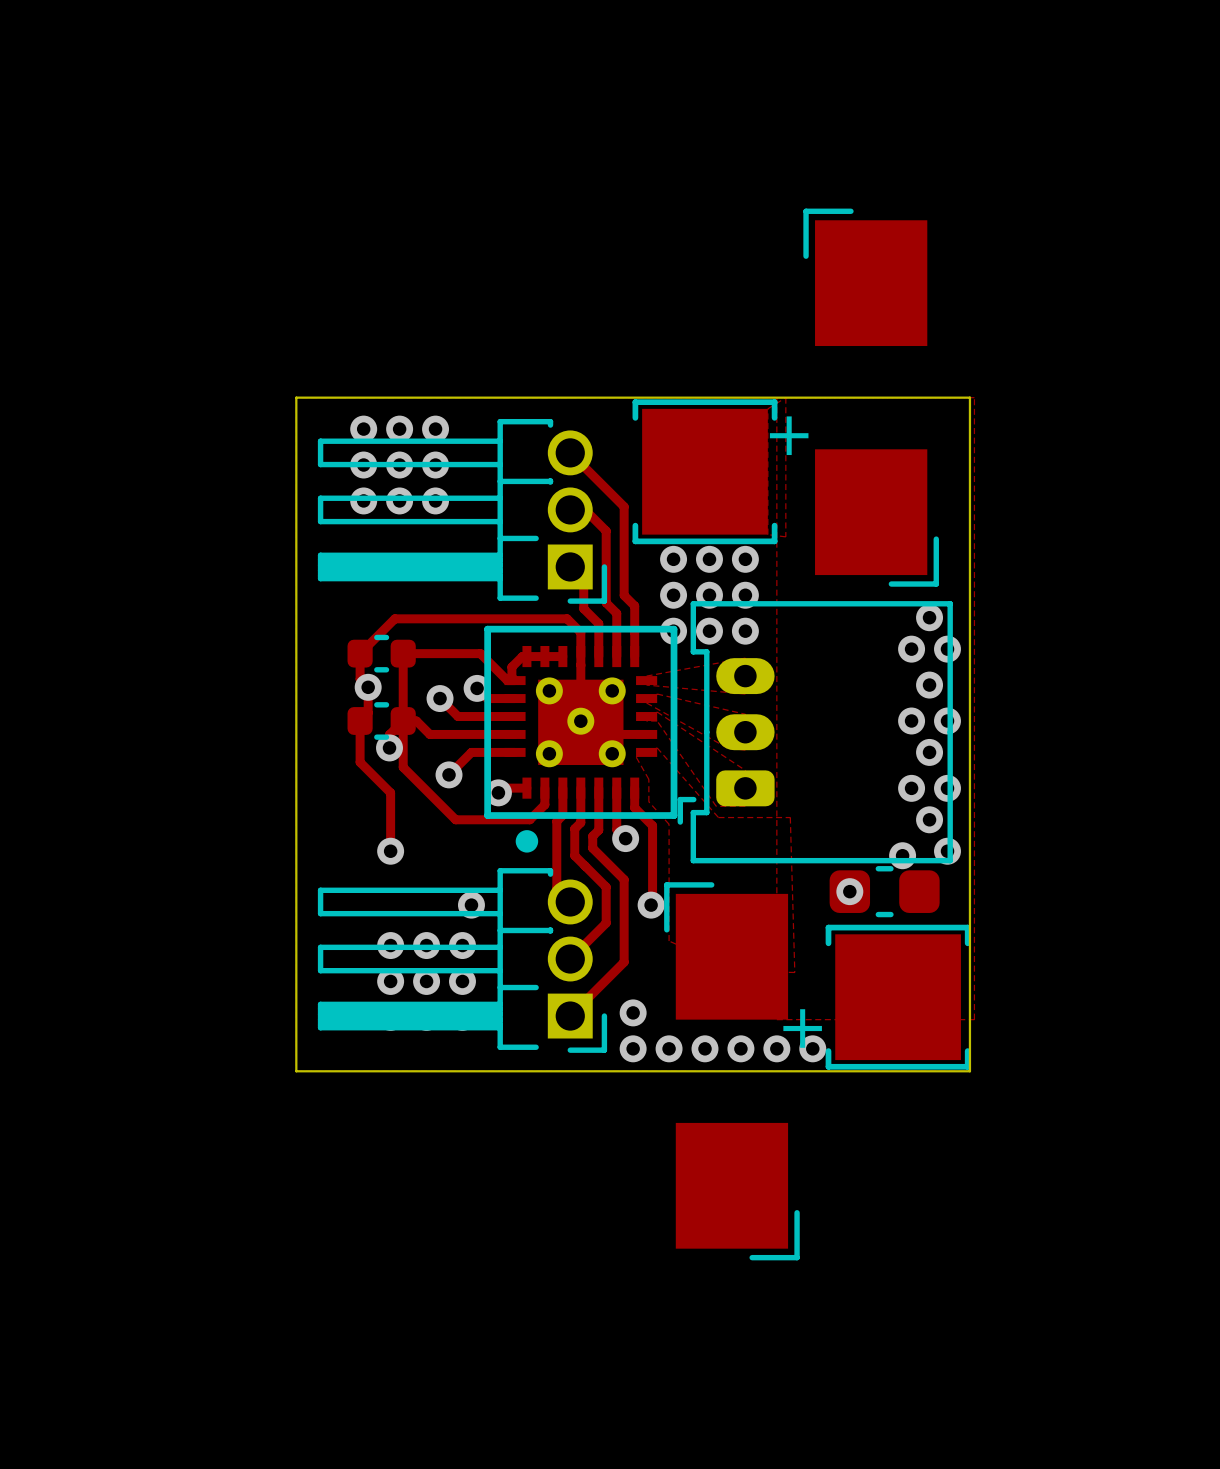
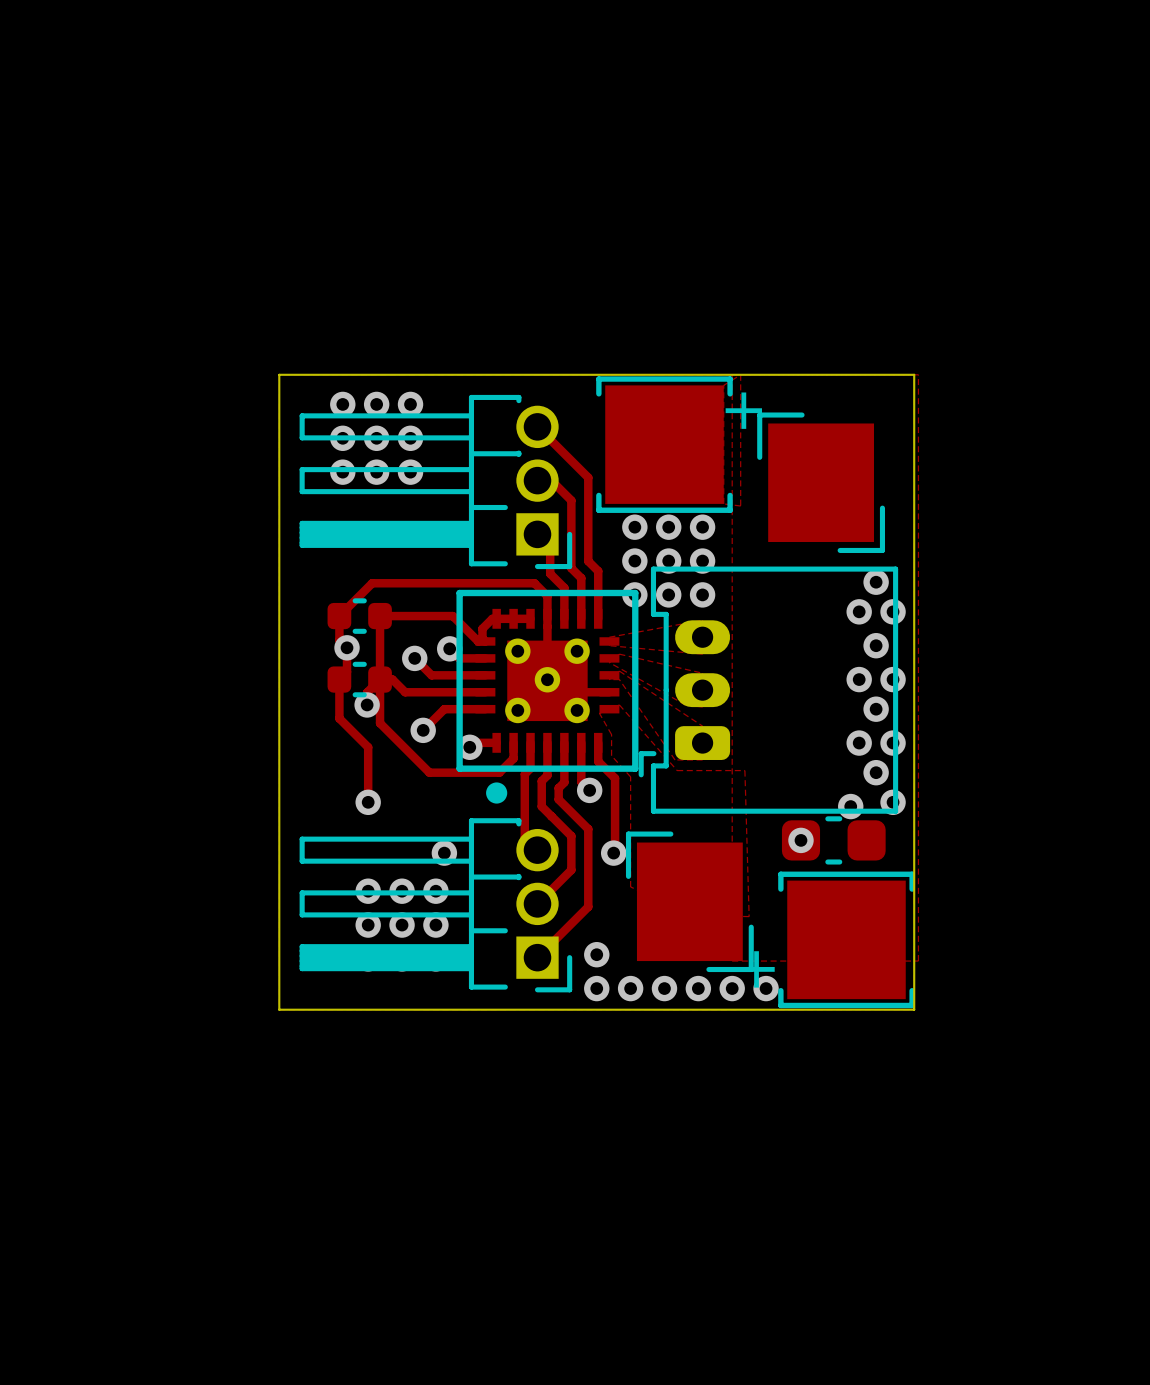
part: (871, 397) -> none
part: none -> (821, 482)
part: none -> (689, 901)
part: (731, 1071) -> none

